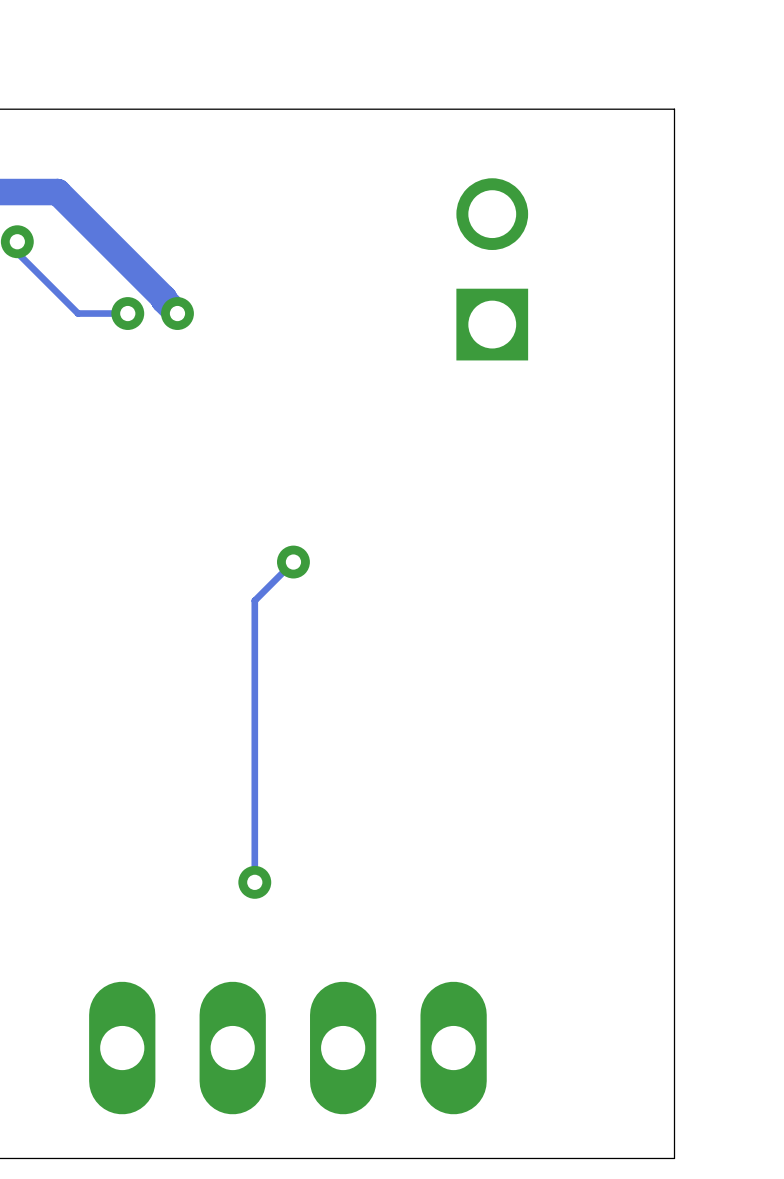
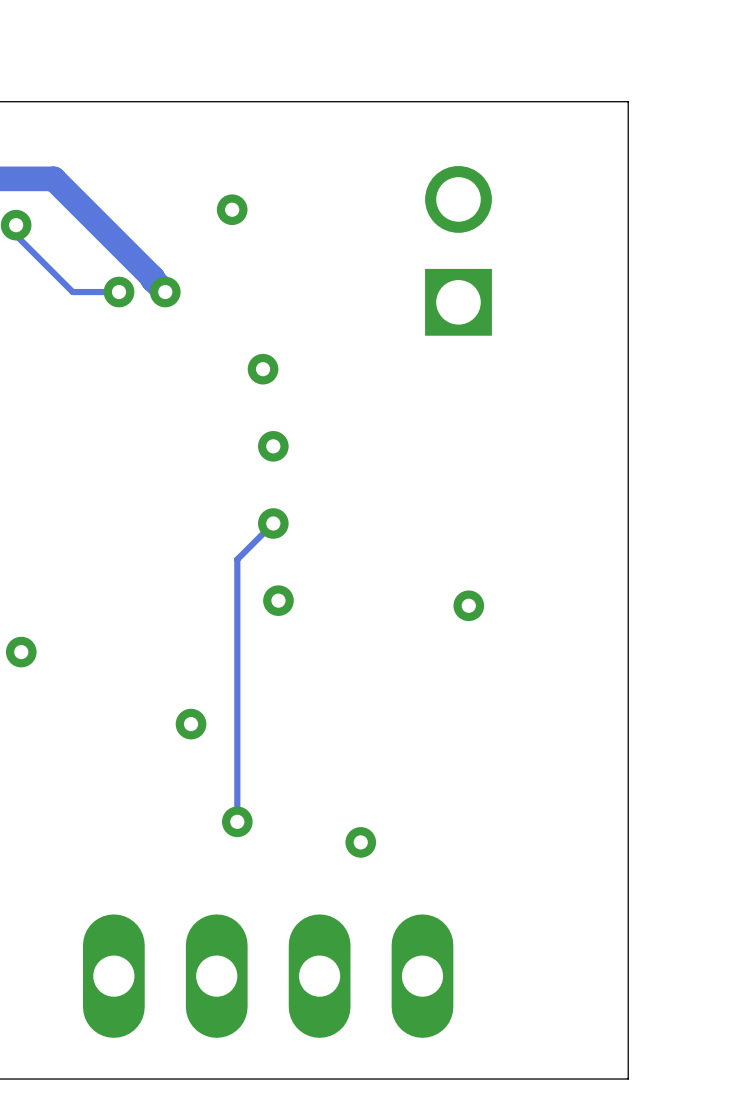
via: none -> (232, 209)
via: none -> (263, 369)
via: none -> (273, 446)
via: none -> (278, 600)
via: none -> (468, 605)
via: none -> (21, 652)
via: none -> (191, 724)
via: none -> (360, 842)

